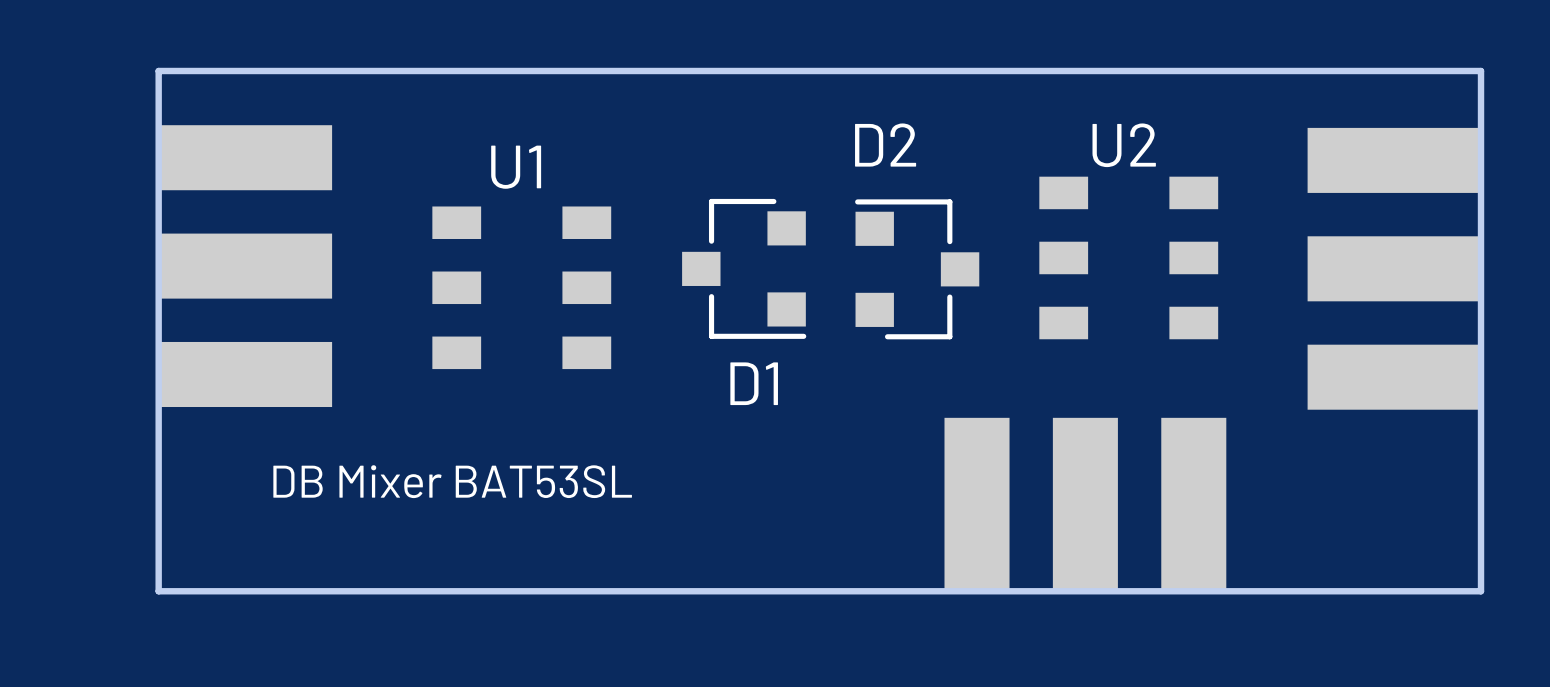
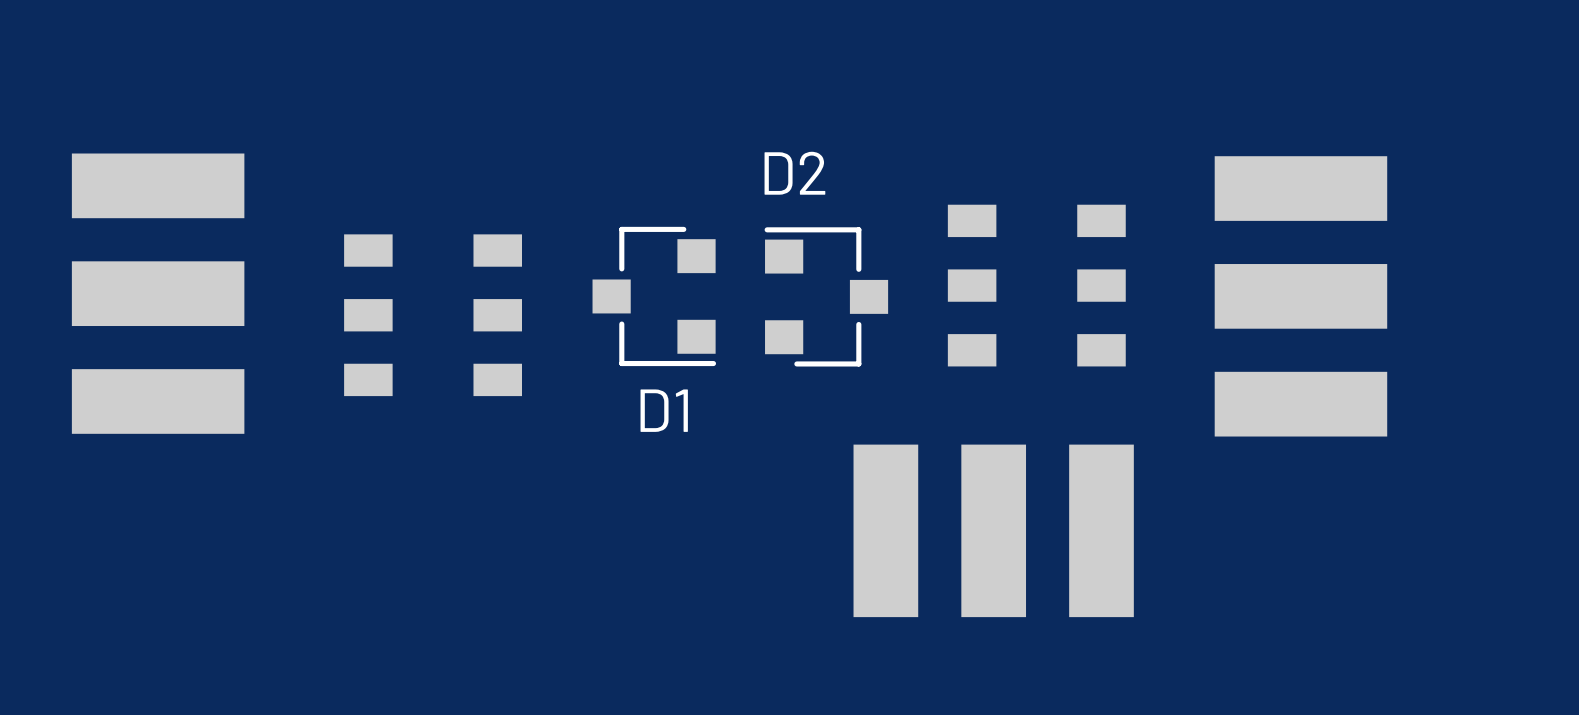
board edge: (158, 71) (158, 591) (1481, 591) (1481, 71) (158, 71) -> none
U2 name: U2 (1124, 145) -> none
U1 name: U1 (516, 167) -> none
text: DB Mixer BAT53SL (452, 481) -> none

